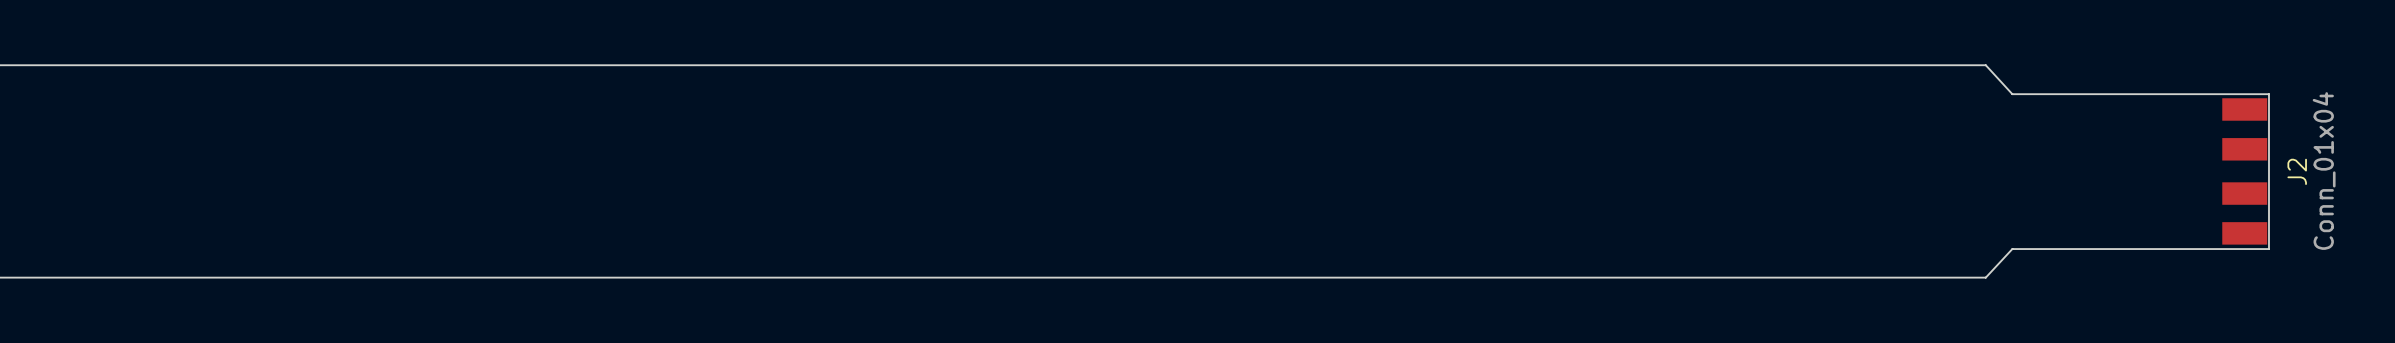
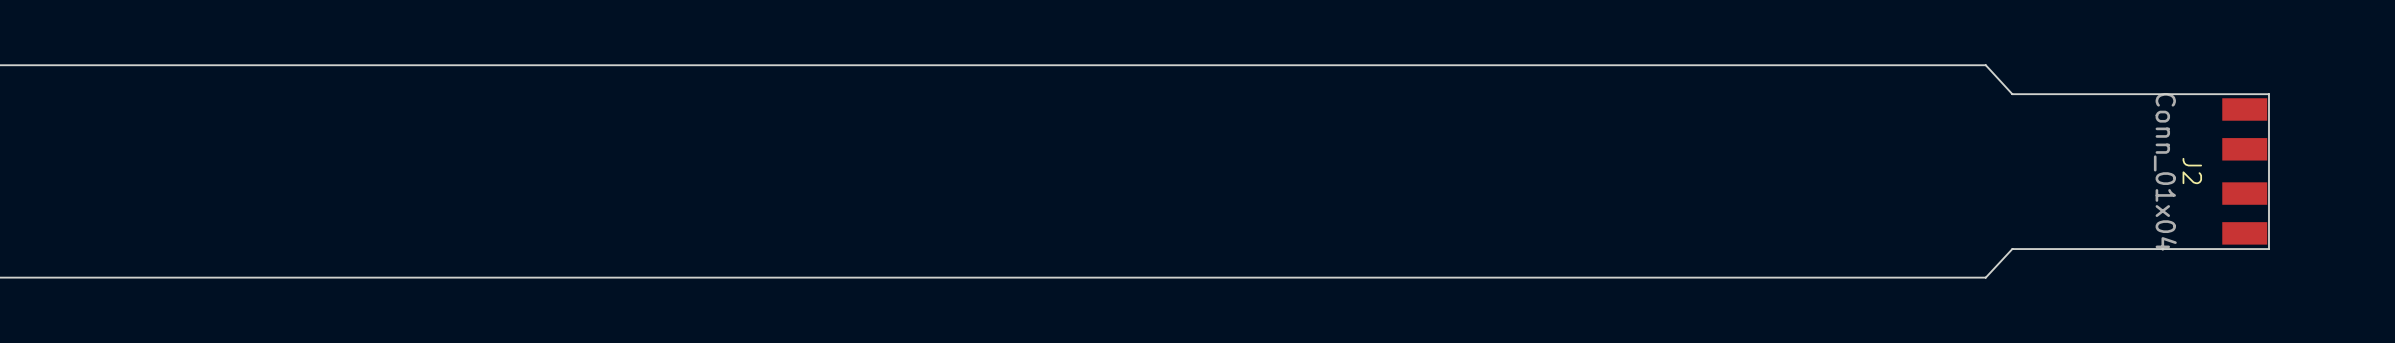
J2 name rotation: 0° (2297, 171) -> 180° (2192, 171)
J2 name position: J2 (2297, 171) -> J2 (2192, 171)
J2 value rotation: 0° (2324, 171) -> 180° (2165, 171)

